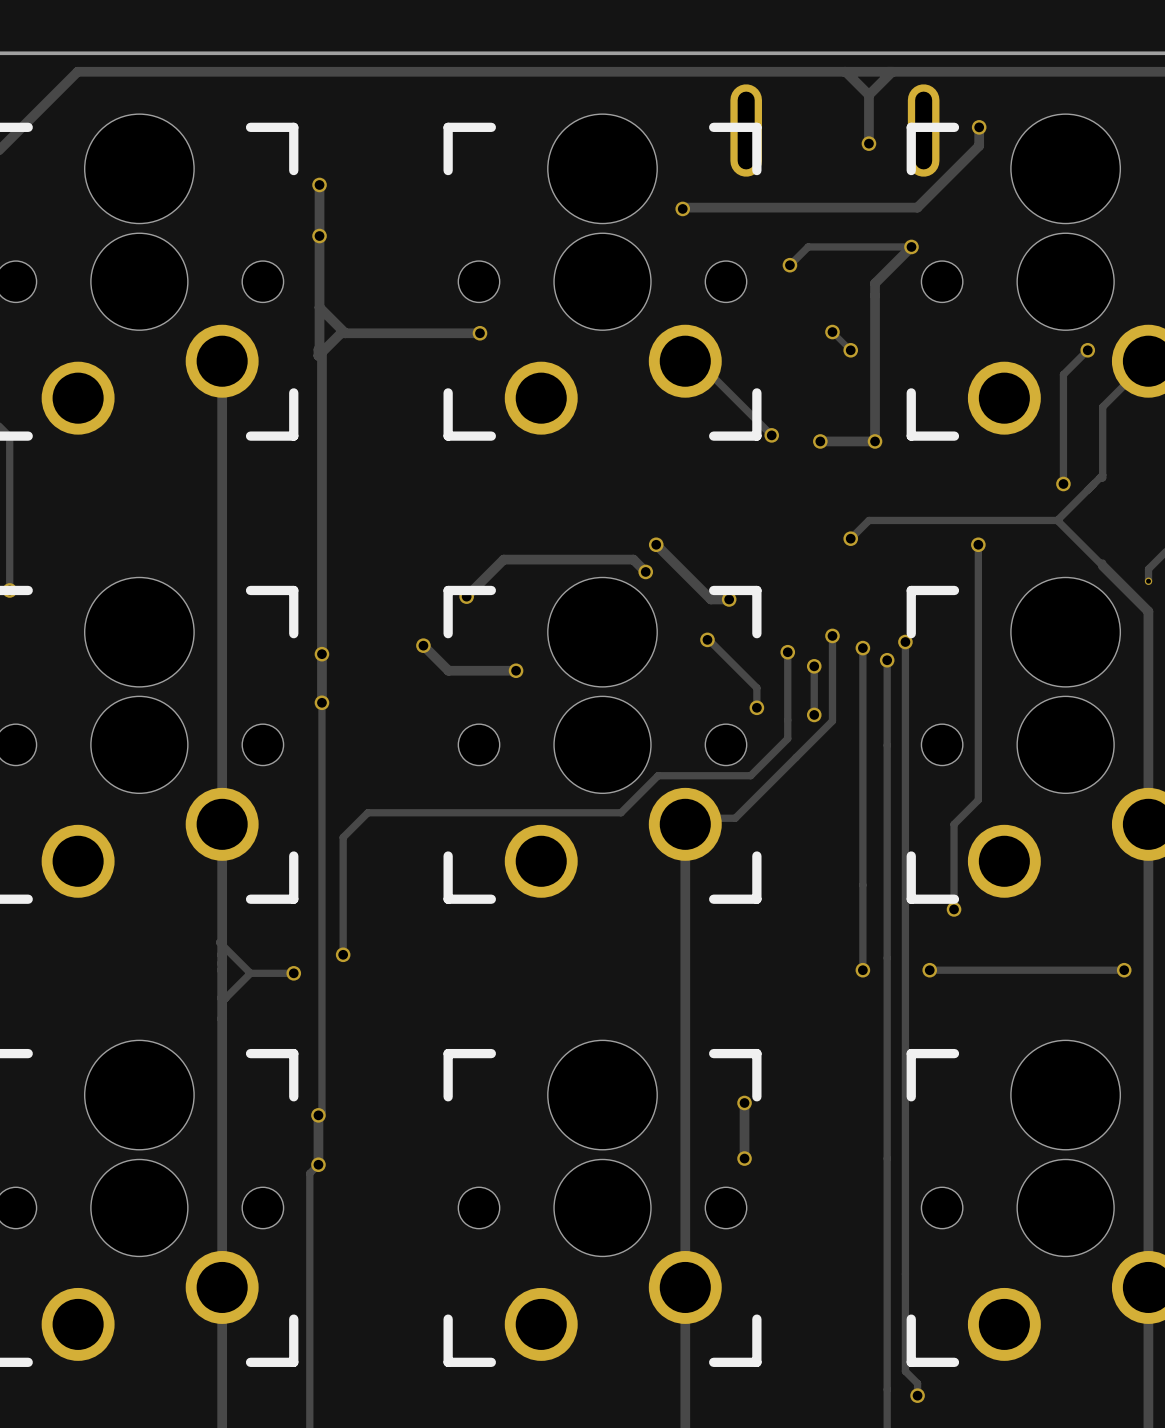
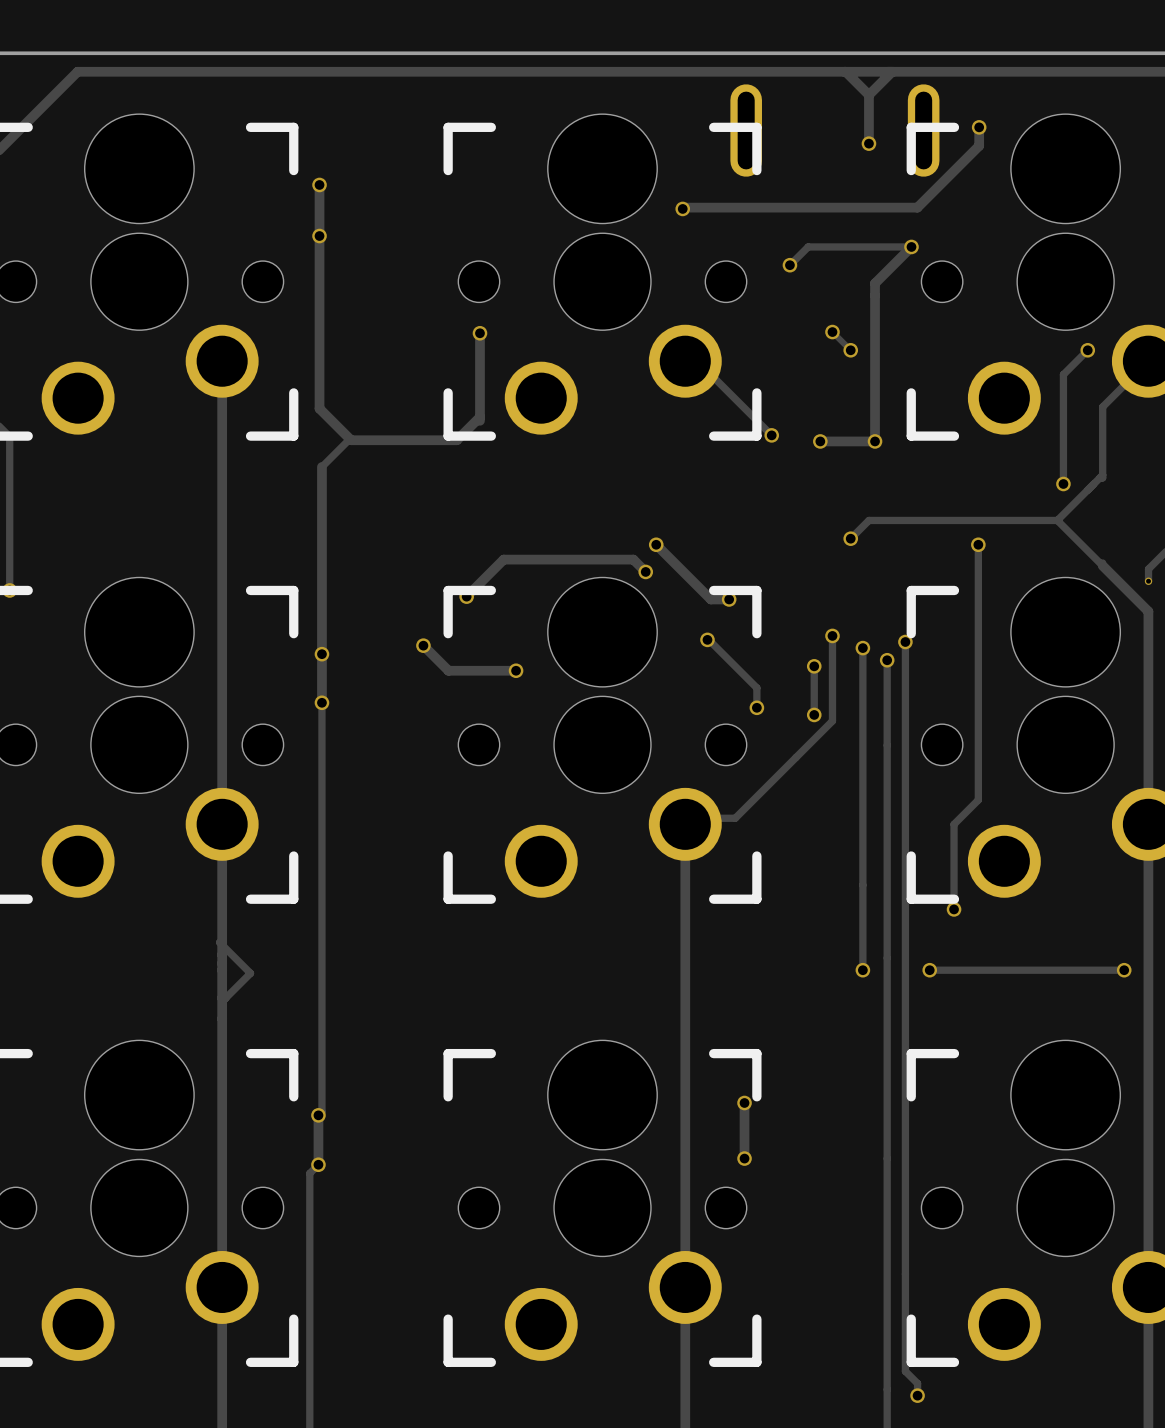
track: (319, 307) (345, 333) -> none
track: (479, 333) (341, 333) (318, 355) (318, 349) (319, 349) (321, 352) (321, 466) -> (479, 333) (479, 420)
track: none -> (319, 354) (319, 408) (351, 440)
track: none -> (479, 417) (456, 440) (351, 440)
track: none -> (351, 440) (348, 440) (321, 466)
track: (787, 652) (787, 738) (750, 775) (658, 775) (621, 812) (367, 812) (343, 837) (343, 954) -> none
via: (787, 652) -> none
via: (343, 954) -> none
track: (250, 973) (293, 973) -> none
via: (293, 973) -> none

